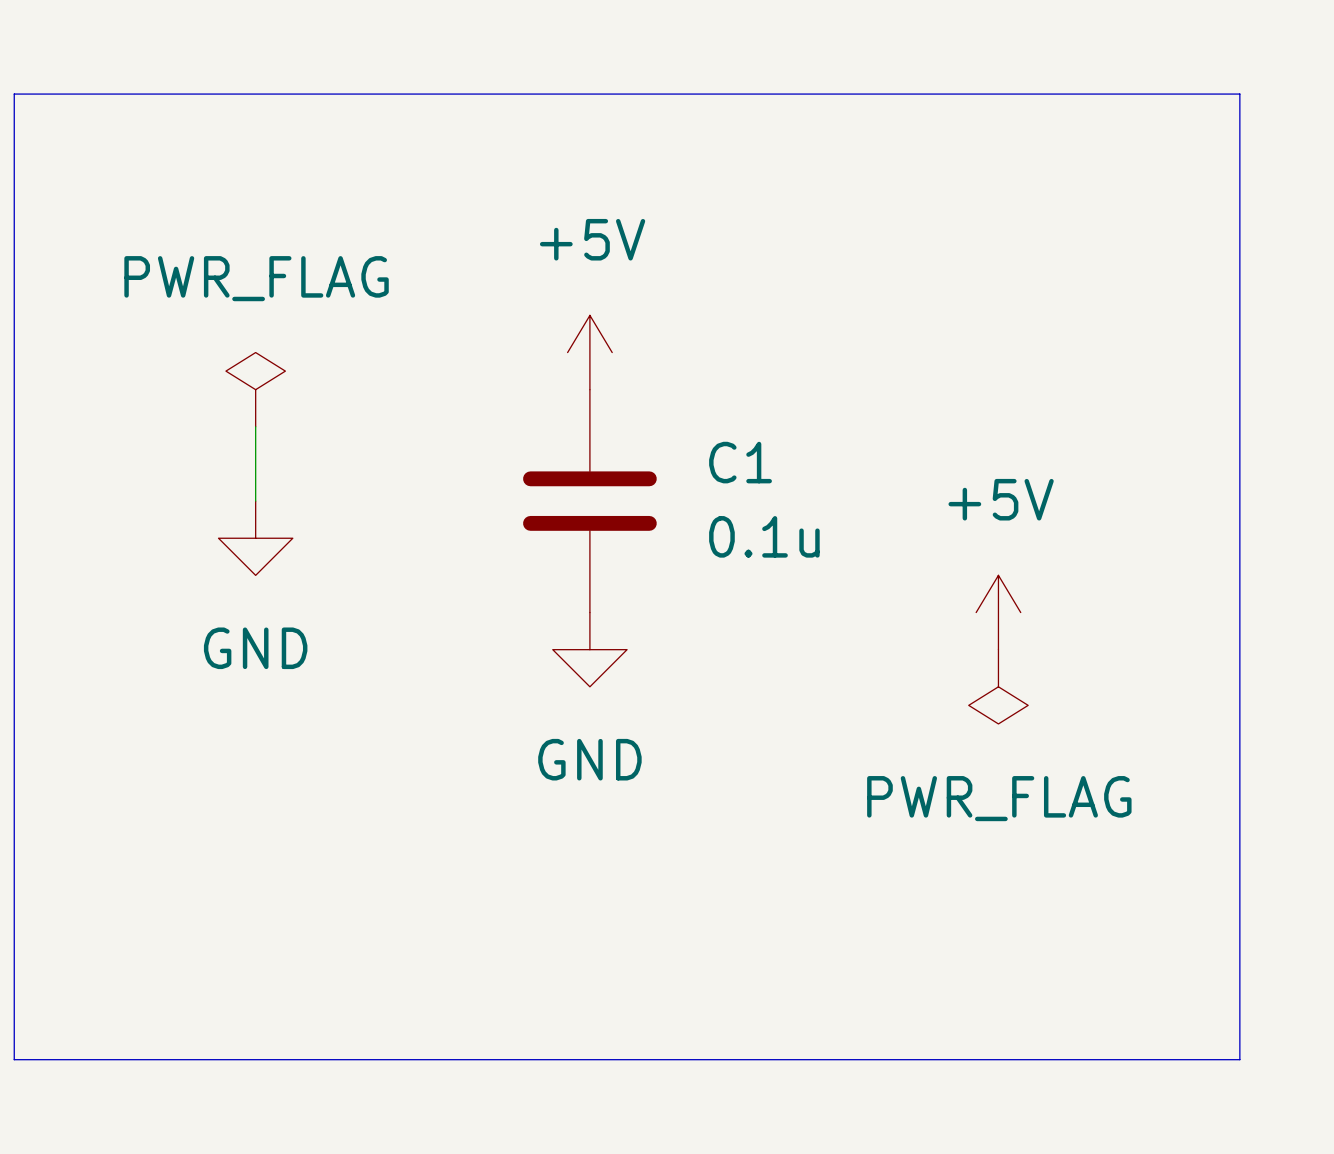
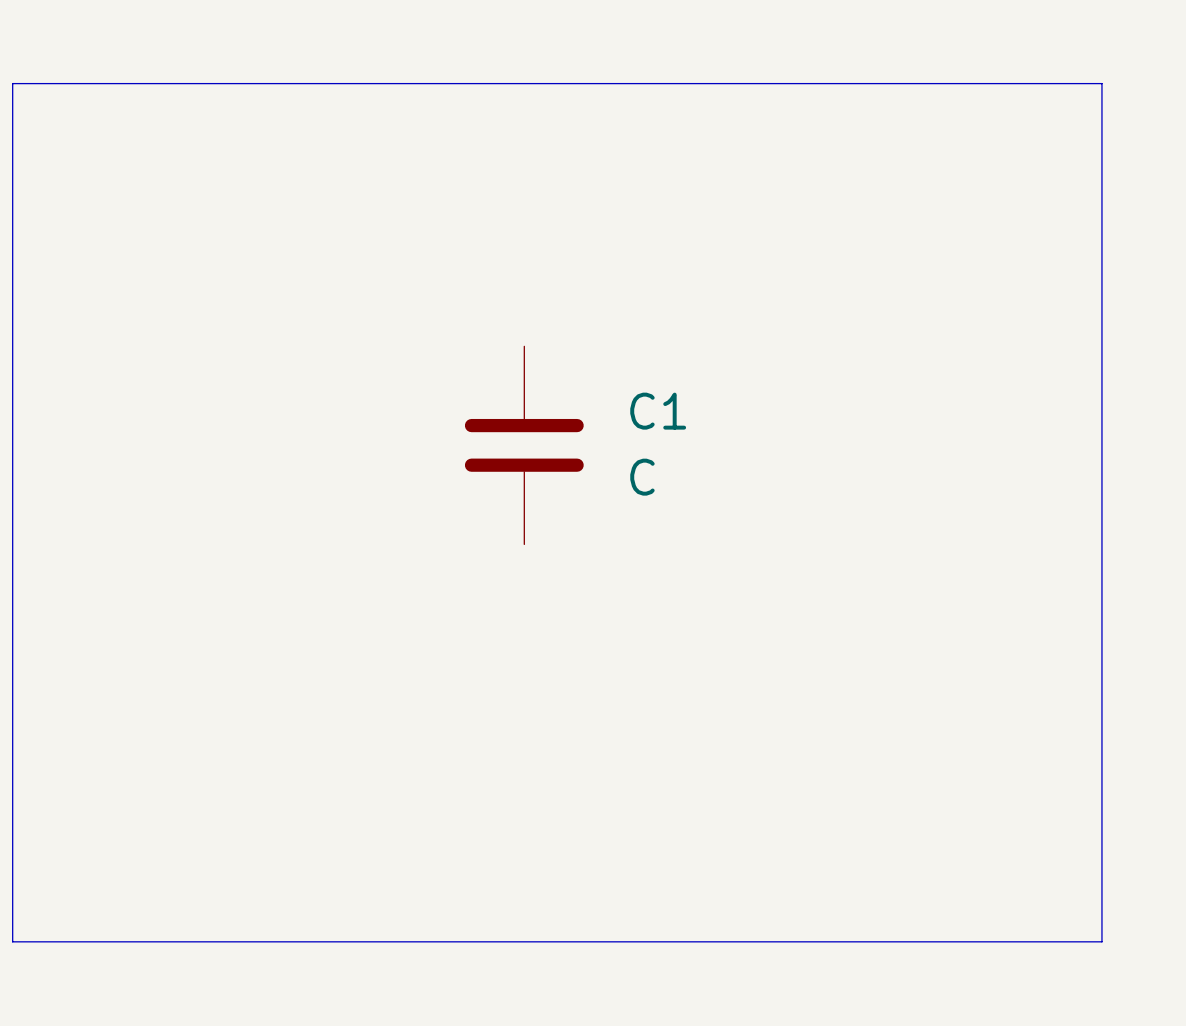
power symbol: +5V (589, 352) -> none
power symbol: PWR_FLAG (255, 389) -> none
wire: (255, 426) (255, 501) -> none
C1 value: 0.1u (764, 536) -> C (642, 477)
power symbol: GND (255, 538) -> none
power symbol: +5V (998, 612) -> none
power symbol: GND (589, 649) -> none
power symbol: PWR_FLAG (998, 686) -> none

